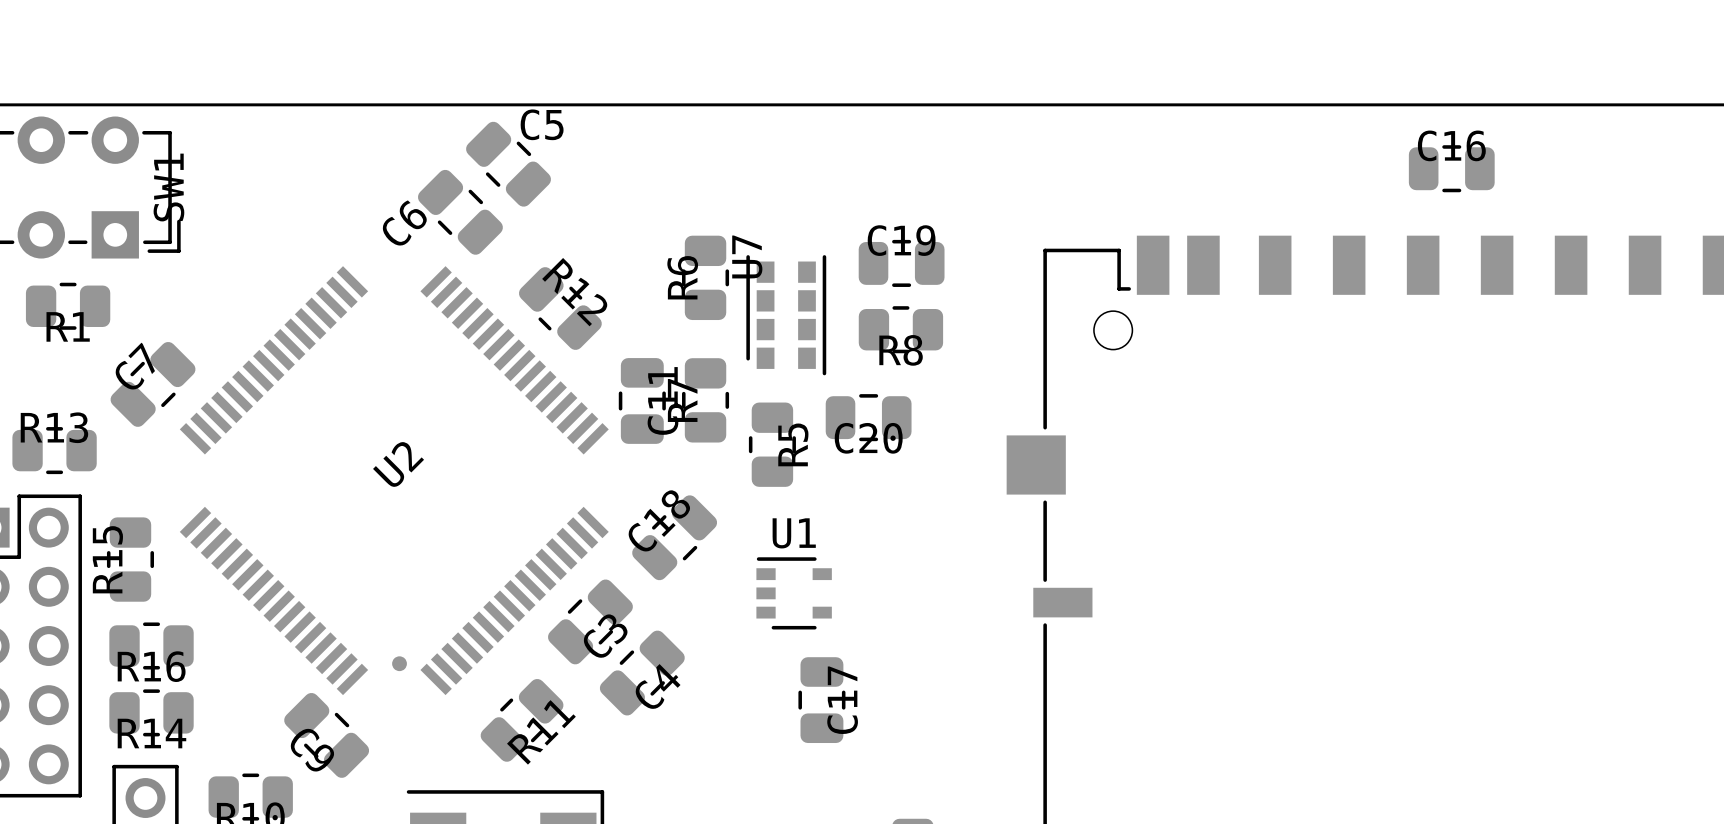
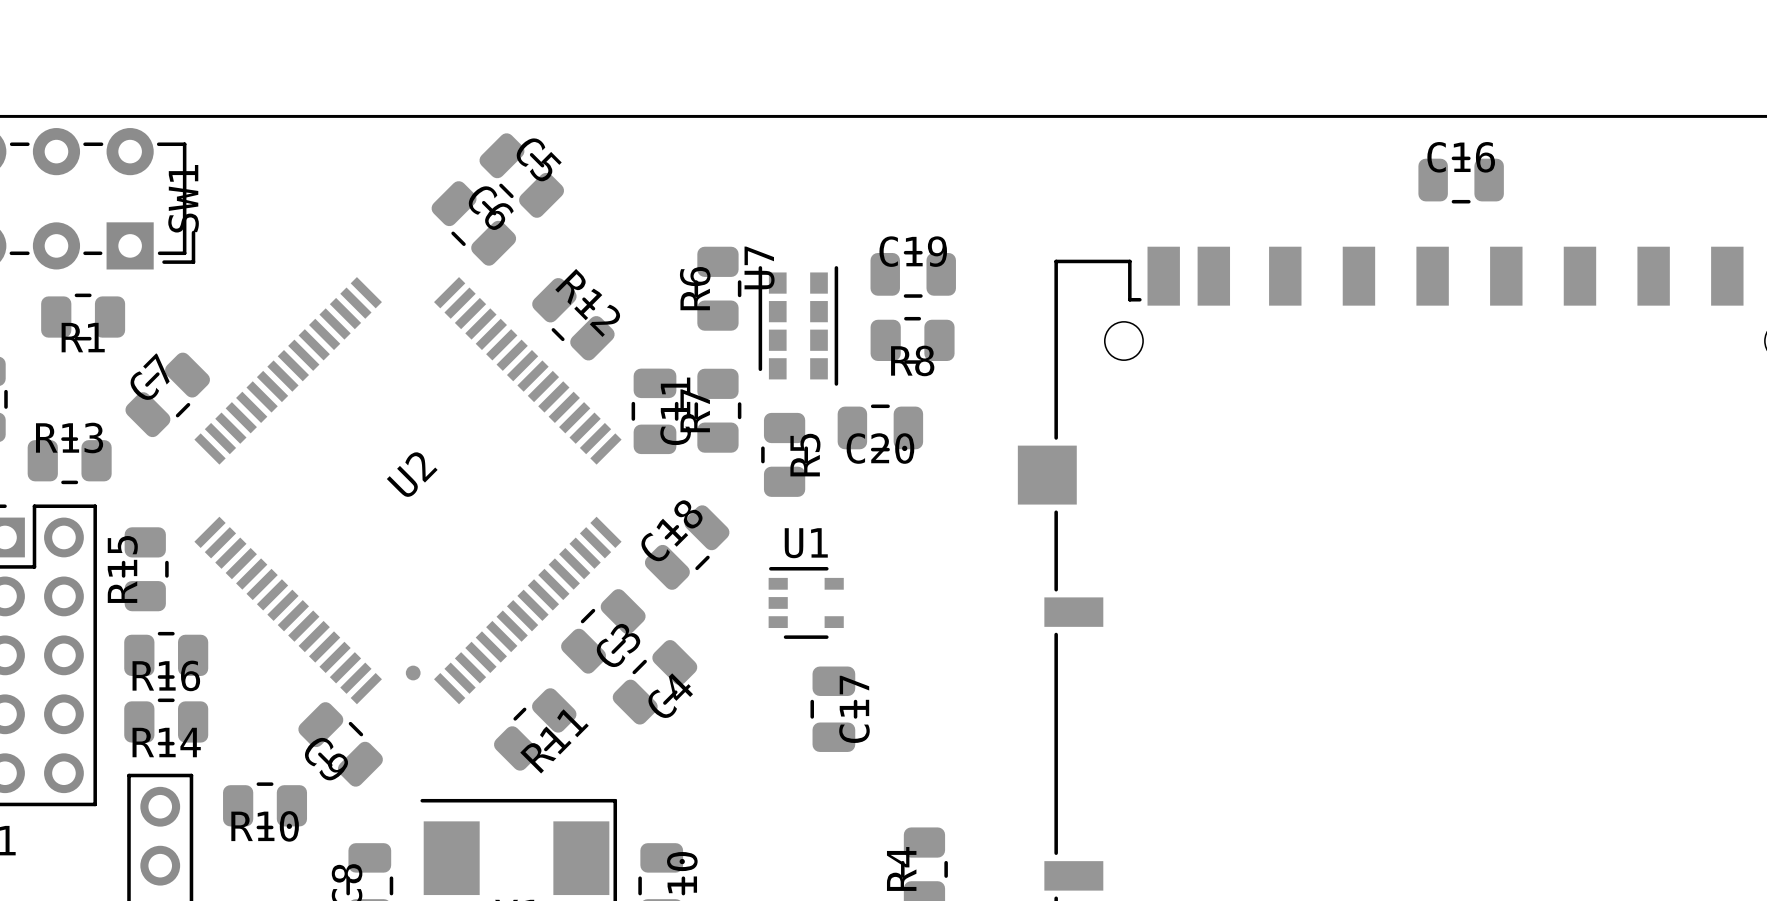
C5 name rotation: 0° (542, 124) -> 45° clockwise (538, 159)
C6 name rotation: 0° (404, 223) -> 90° clockwise (491, 207)

